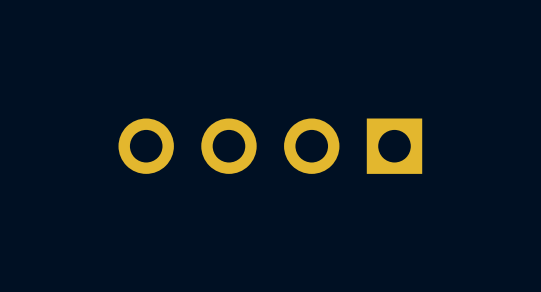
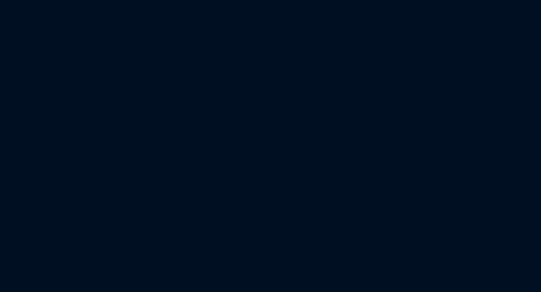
part: (270, 146) -> none

